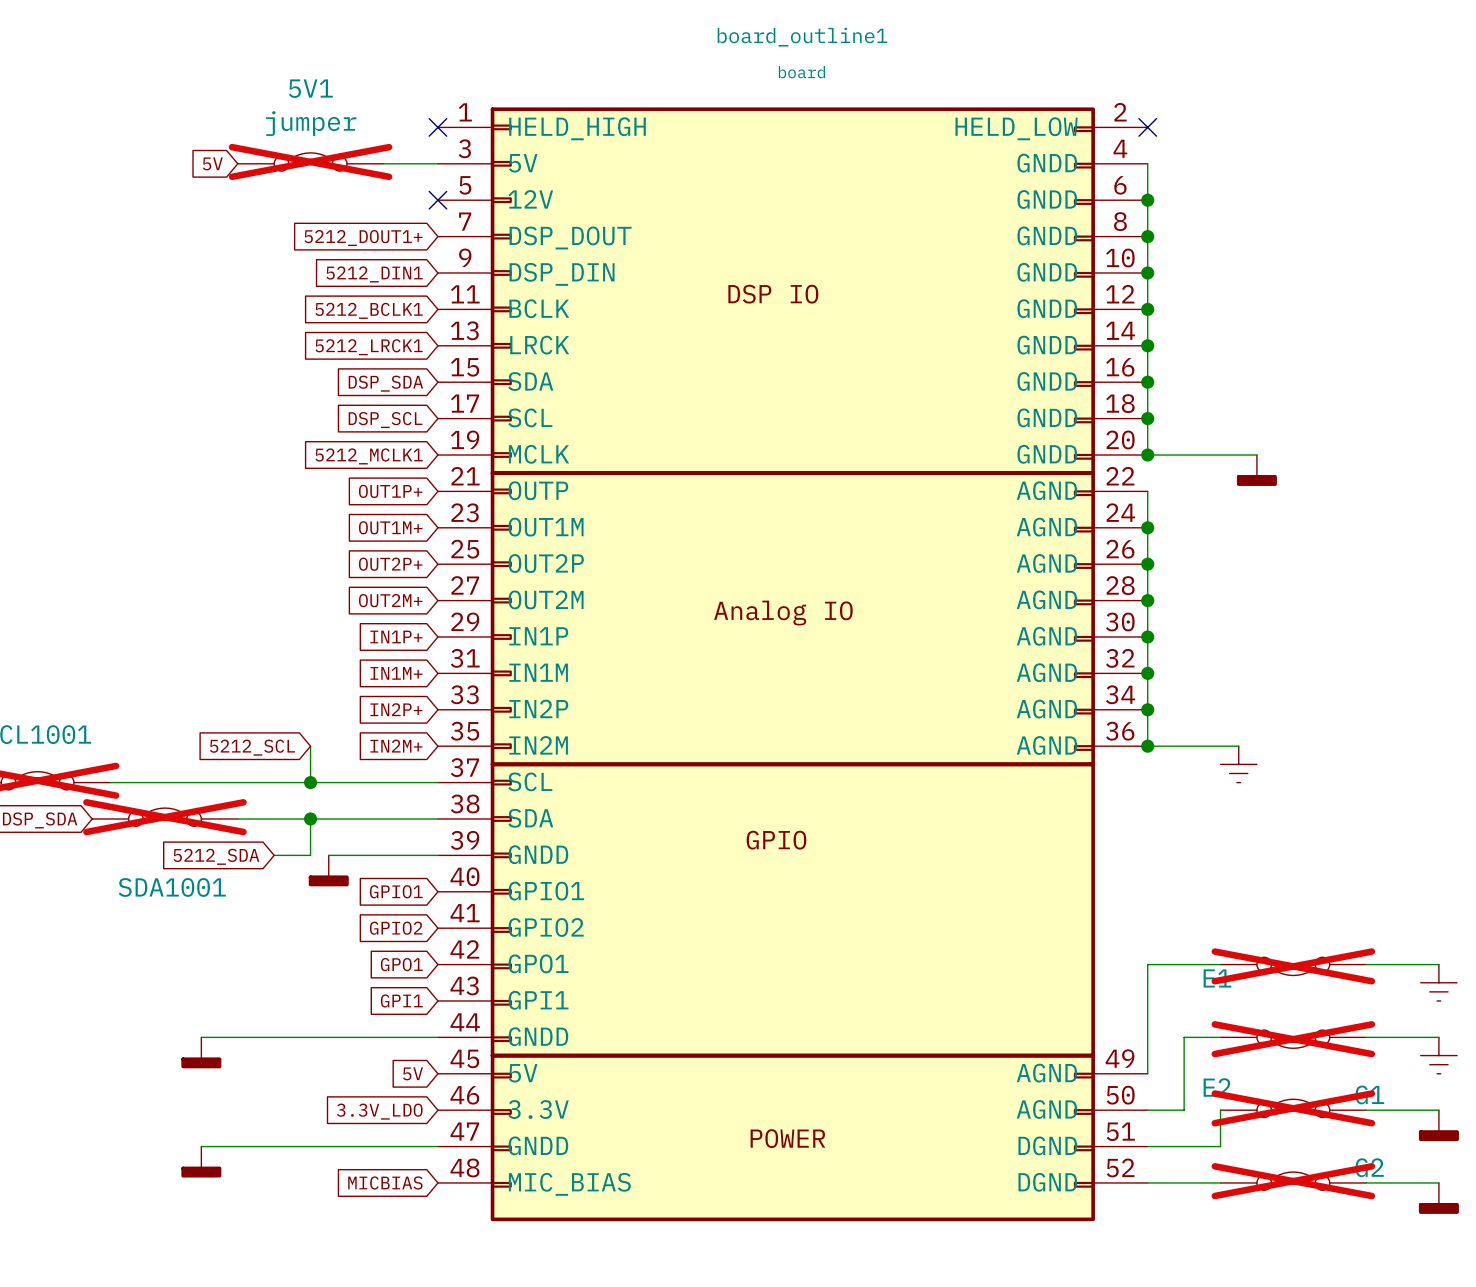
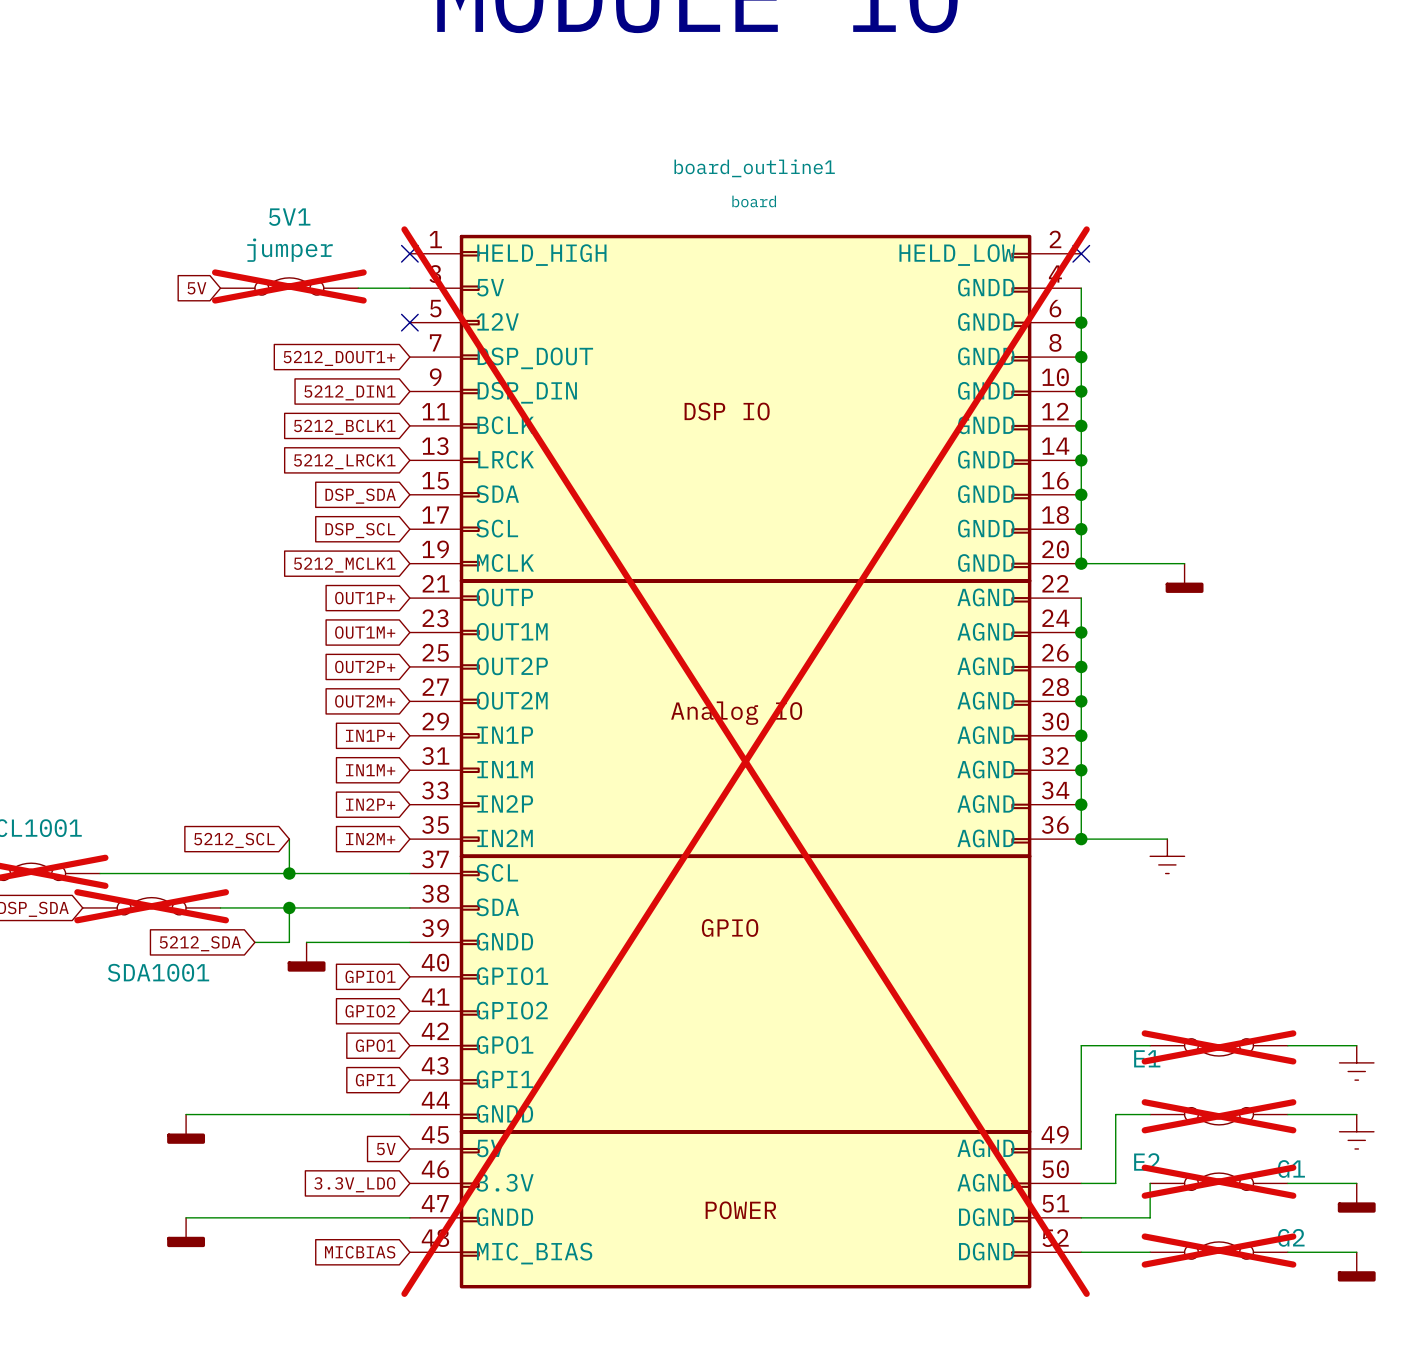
board_outline1 do-not-place cross: none -> (745, 761)

